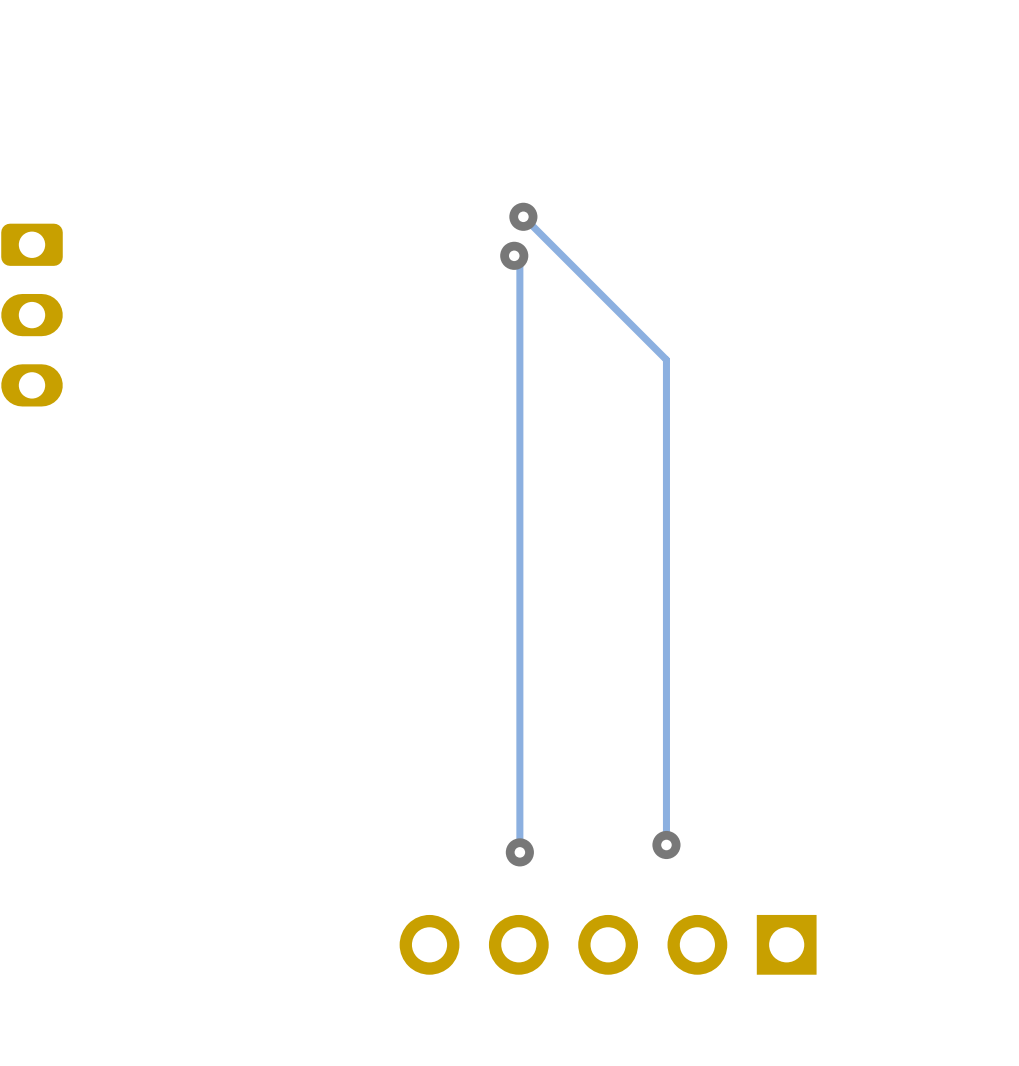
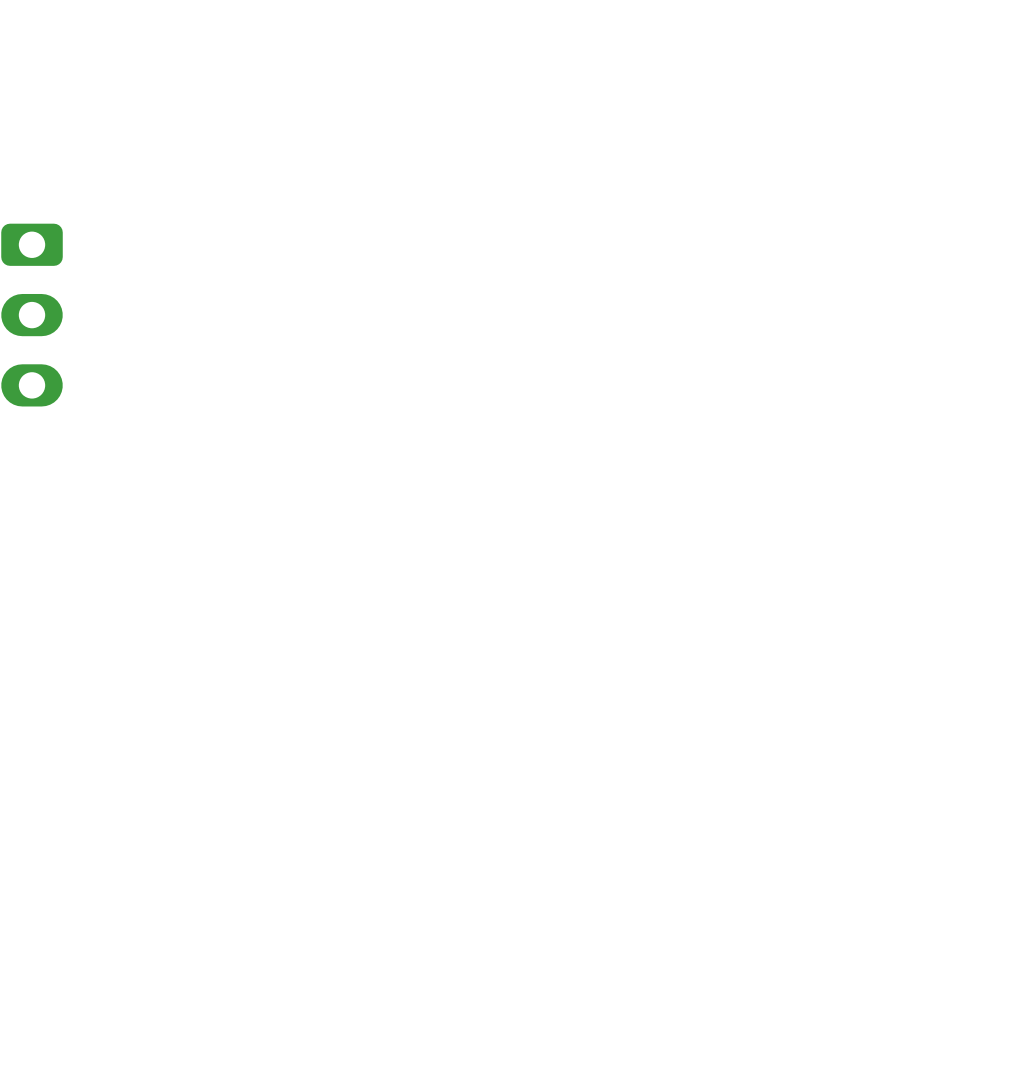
track: (523, 216) (666, 359) (666, 844) -> none
via: (523, 216) -> none
track: (514, 255) (519, 261) (519, 852) -> none
via: (514, 255) -> none
via: (666, 844) -> none
via: (519, 852) -> none
part: (608, 944) -> none

